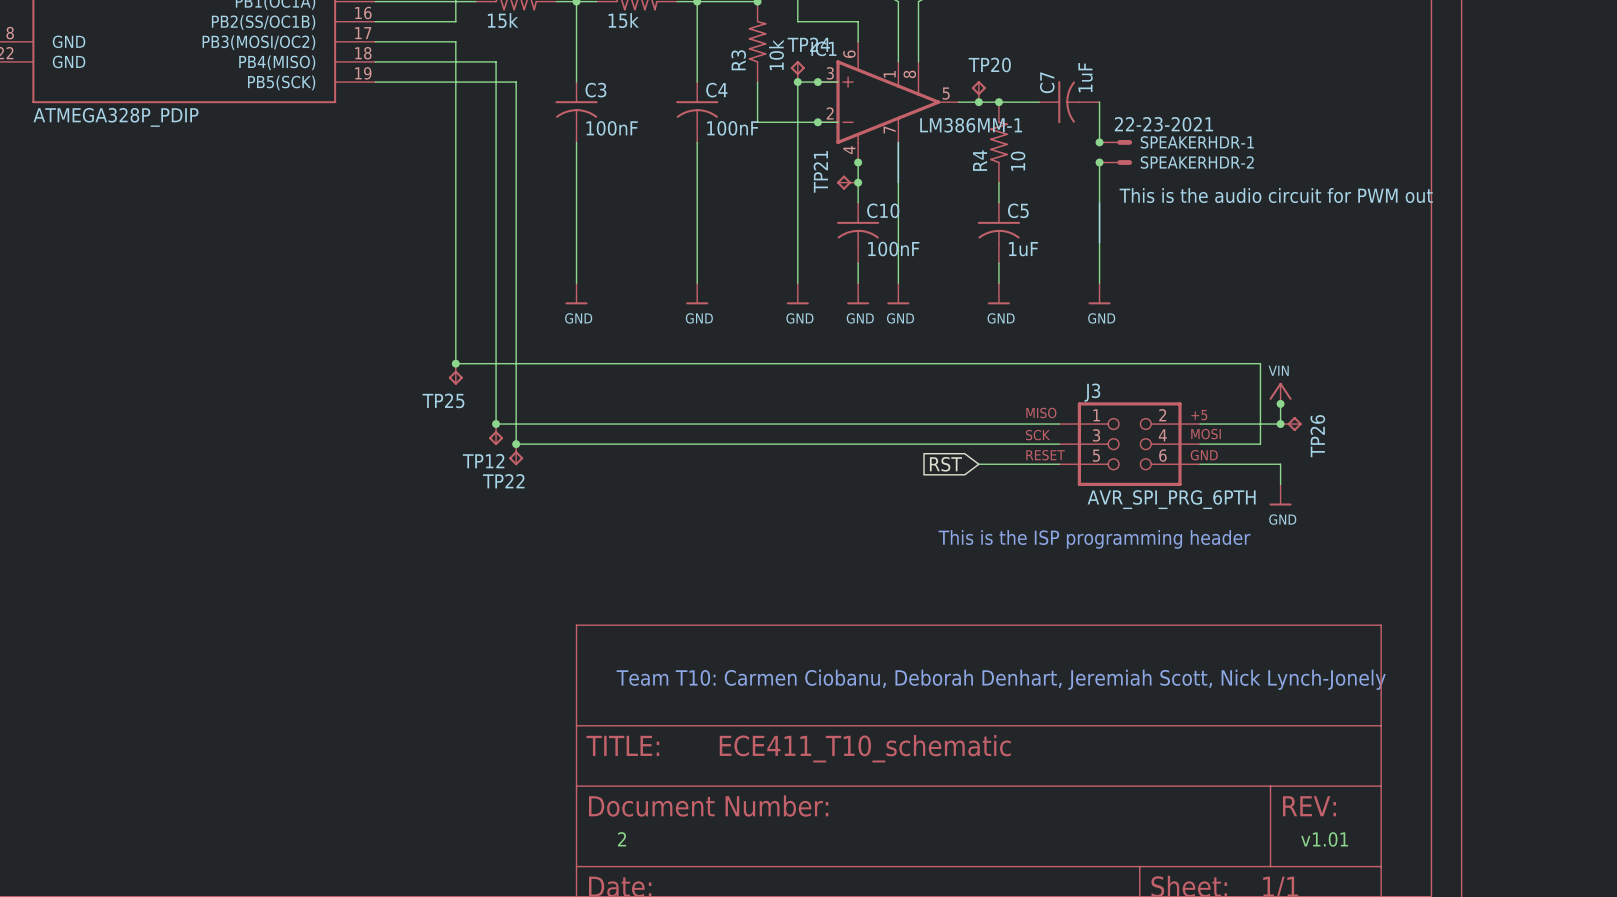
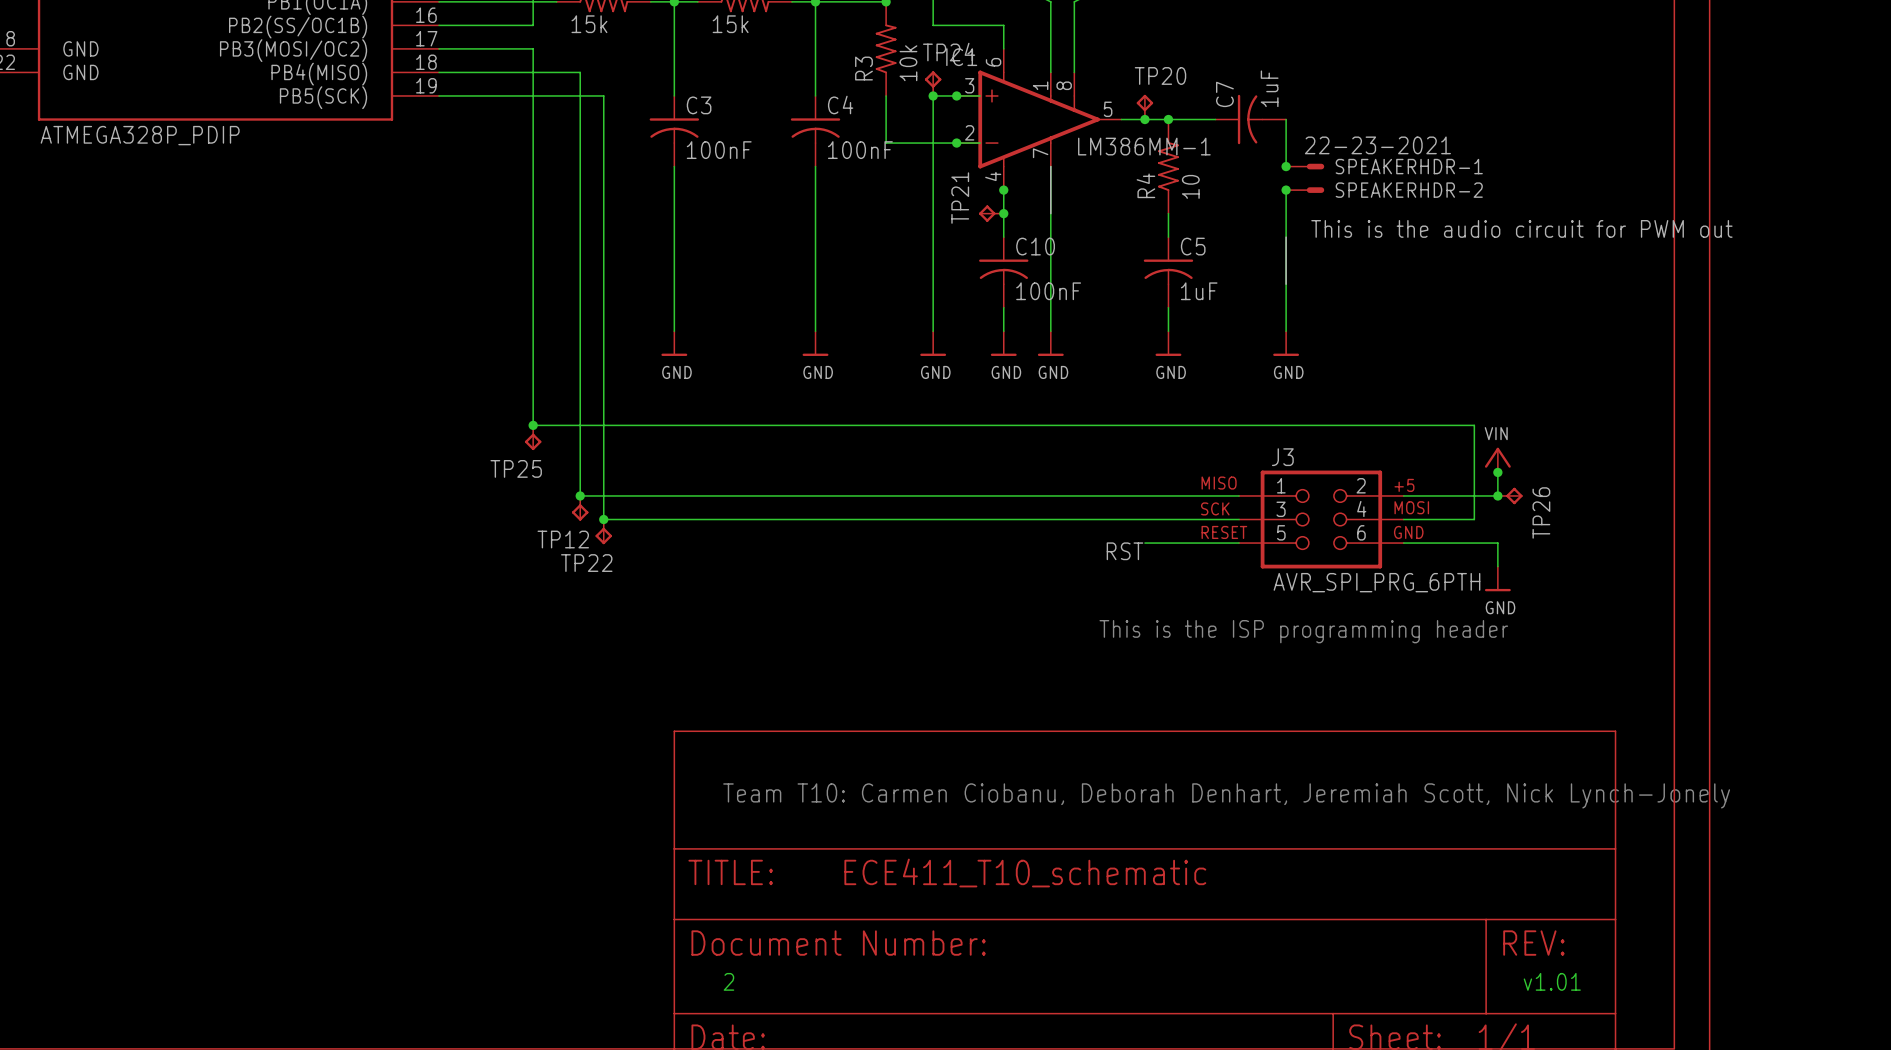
global label: RST (945, 464) -> none
label: none -> RST (1125, 551)

